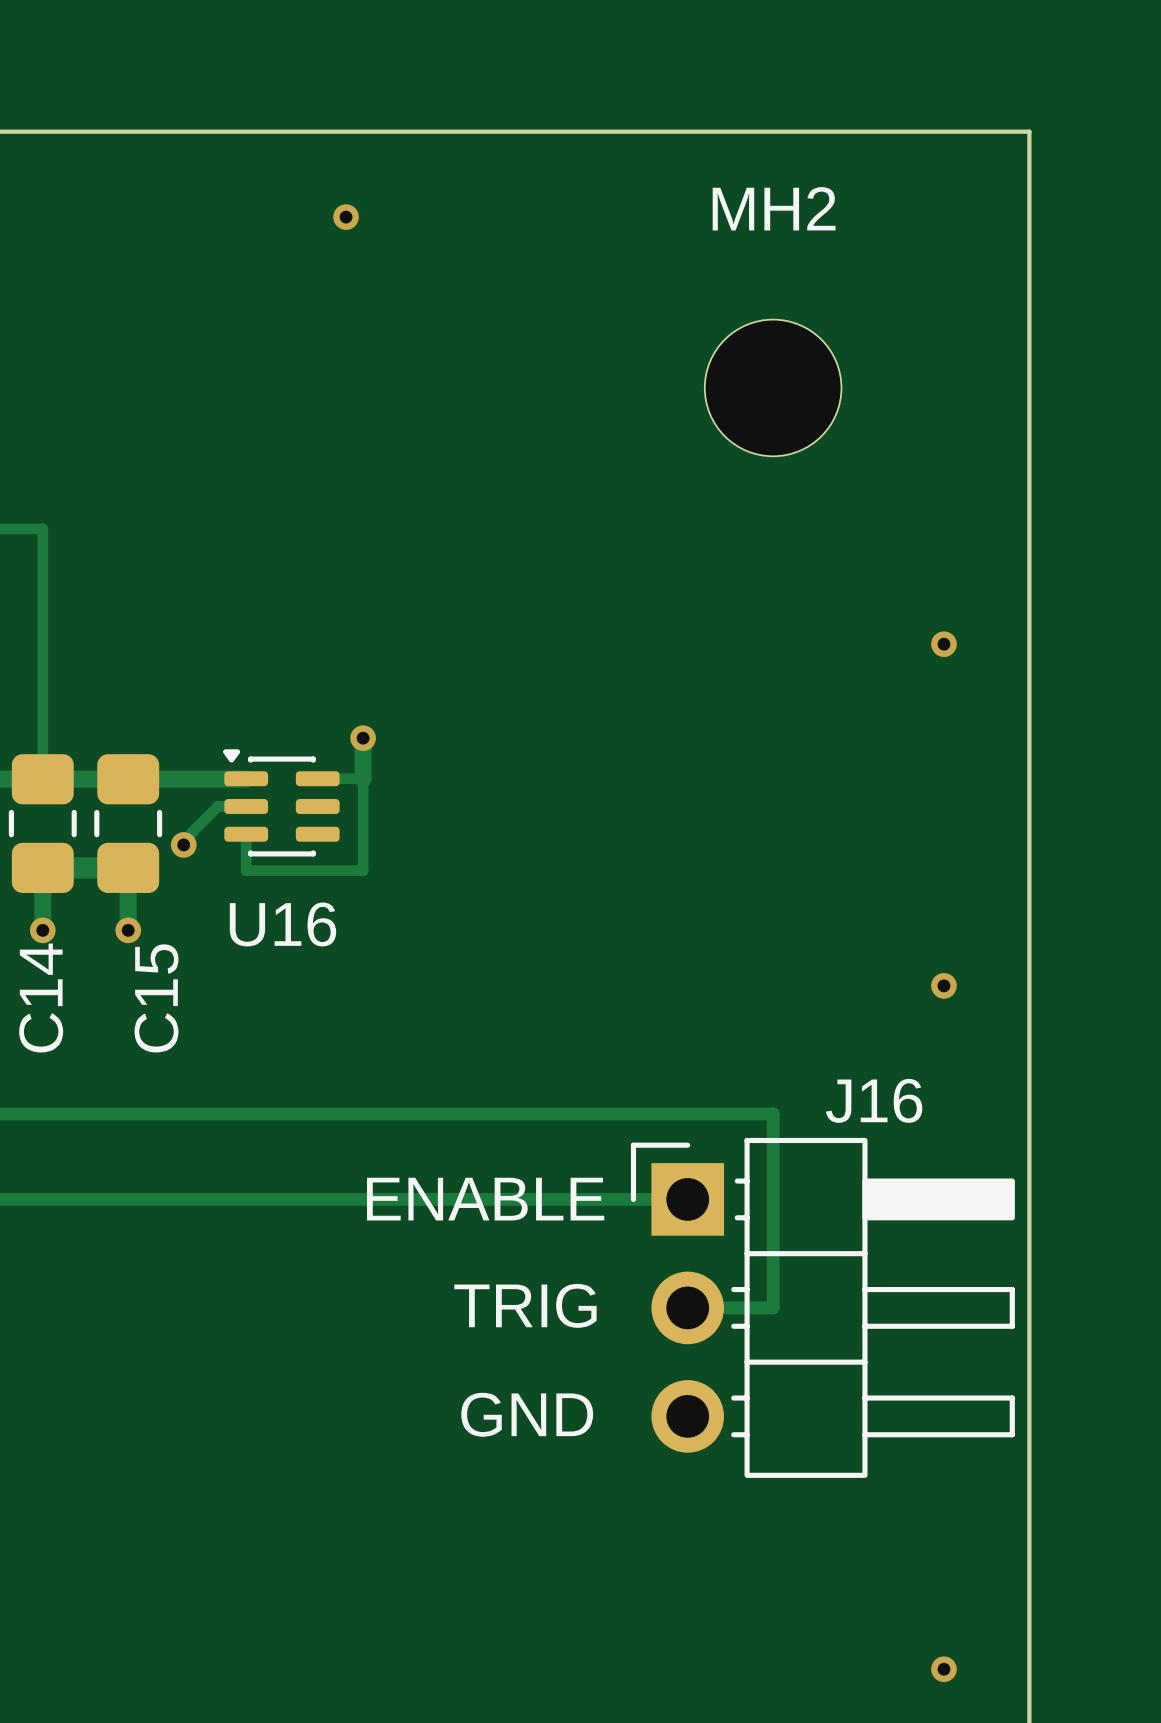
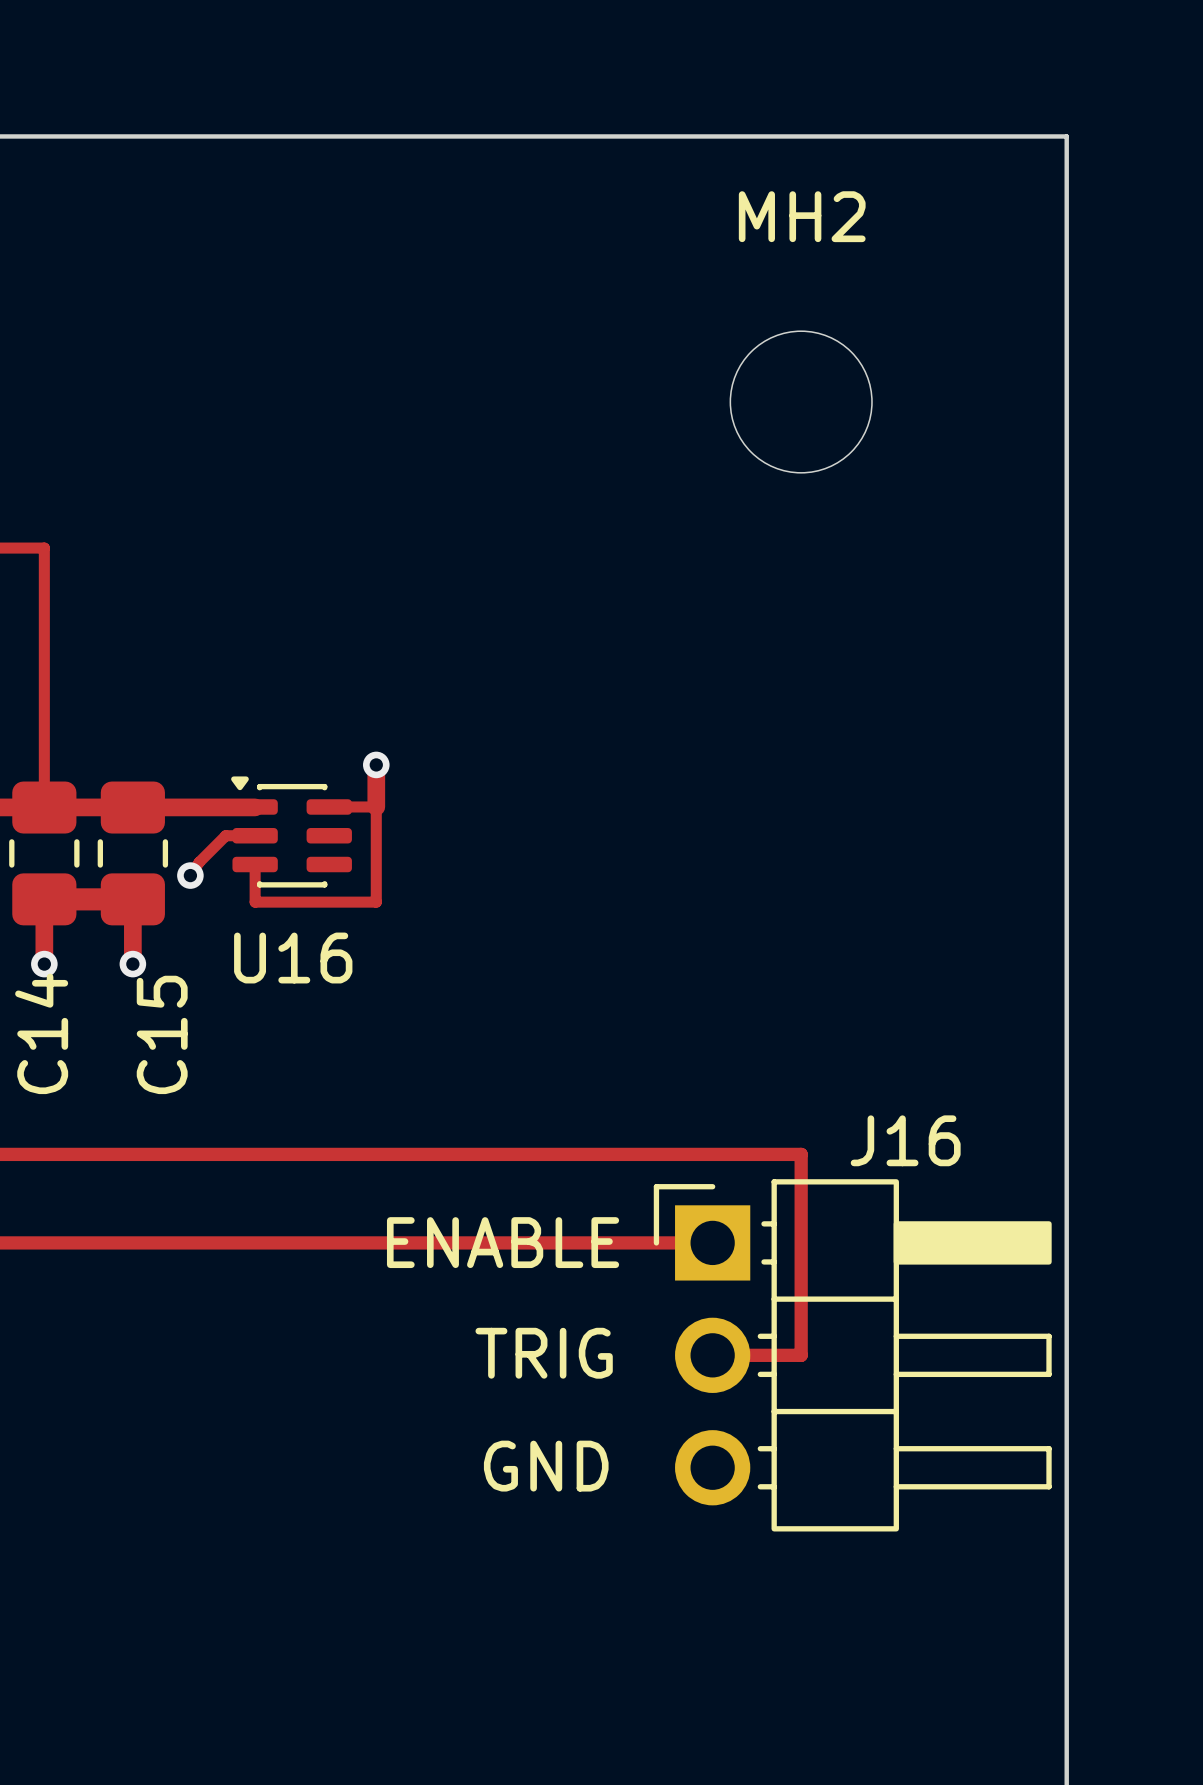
via: (346, 217) -> none
via: (943, 644) -> none
via: (943, 985) -> none
via: (943, 1669) -> none

